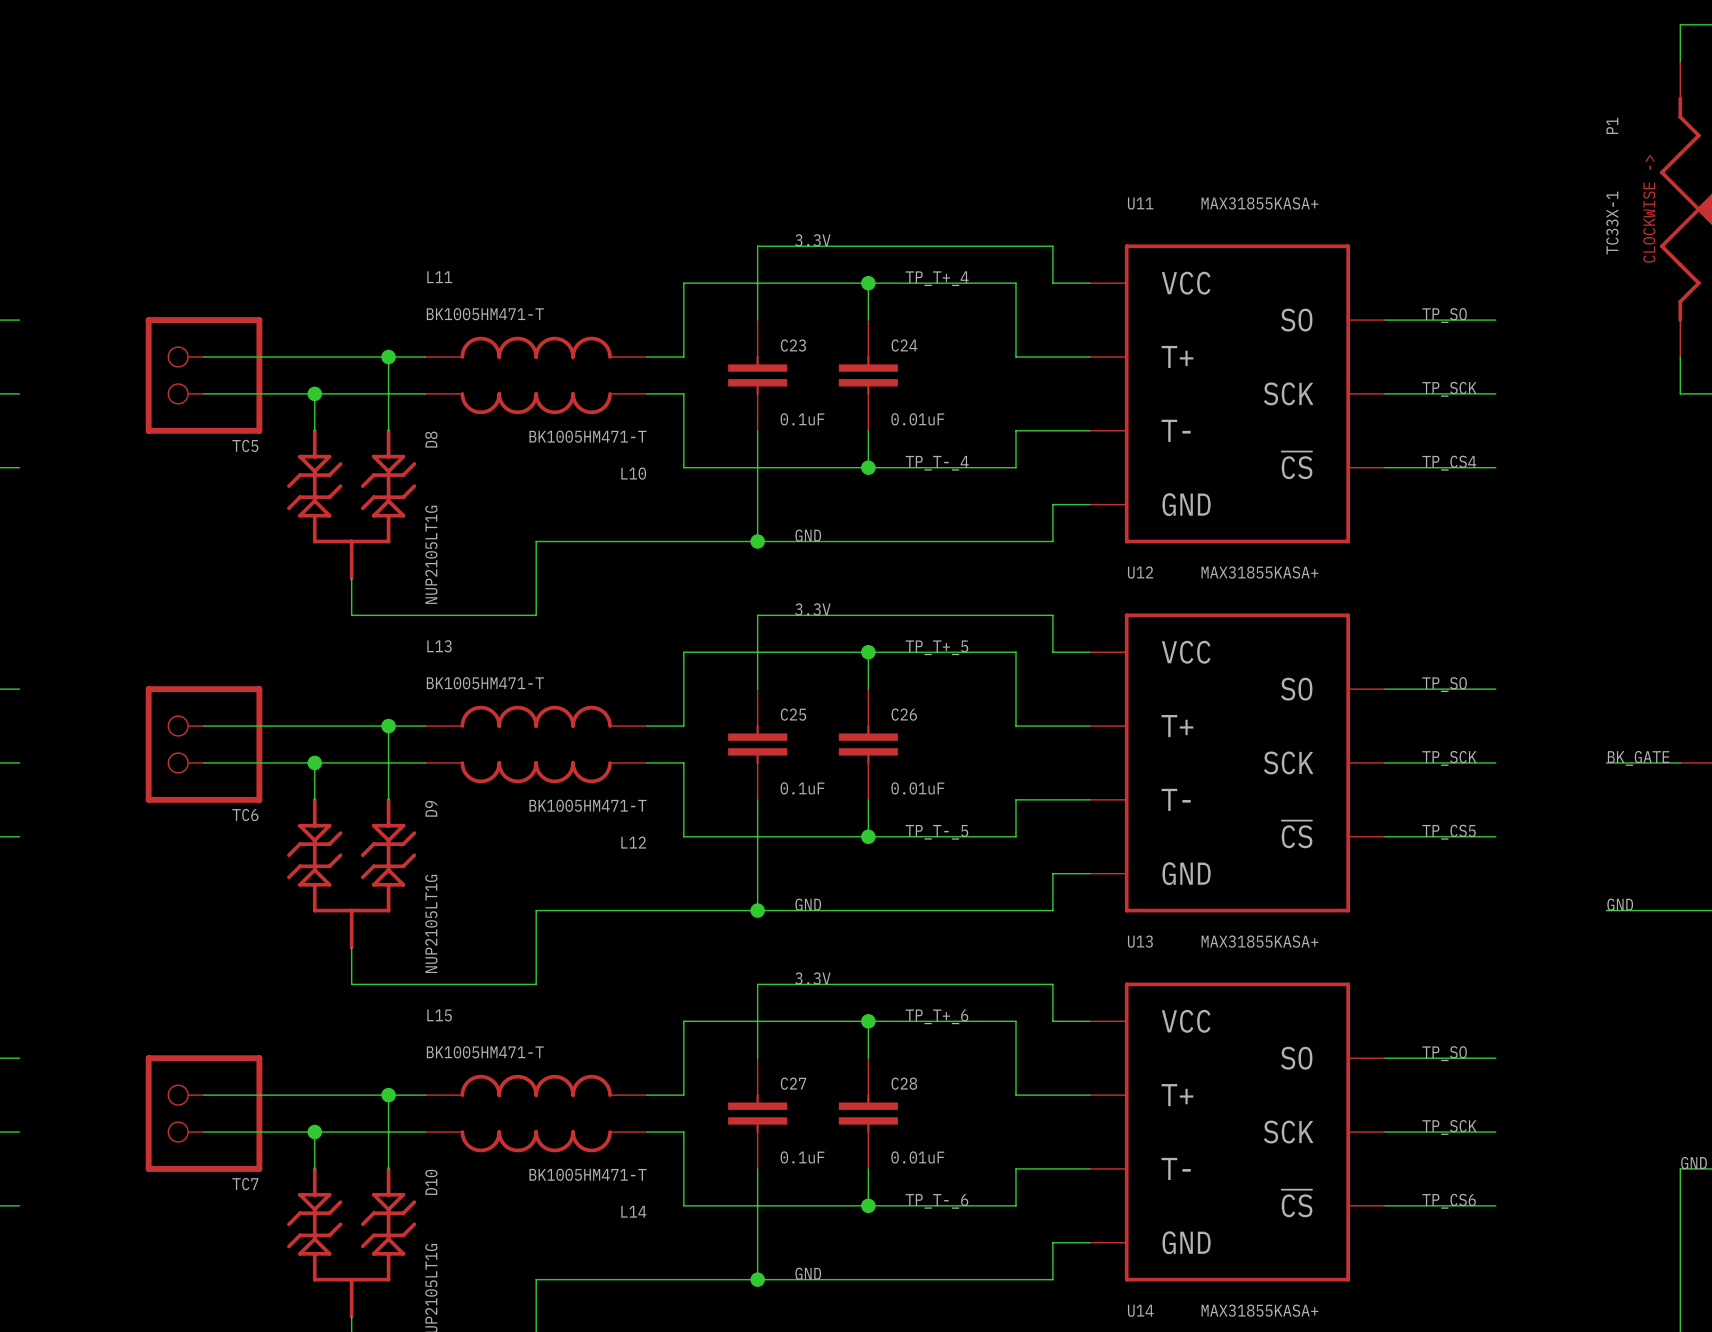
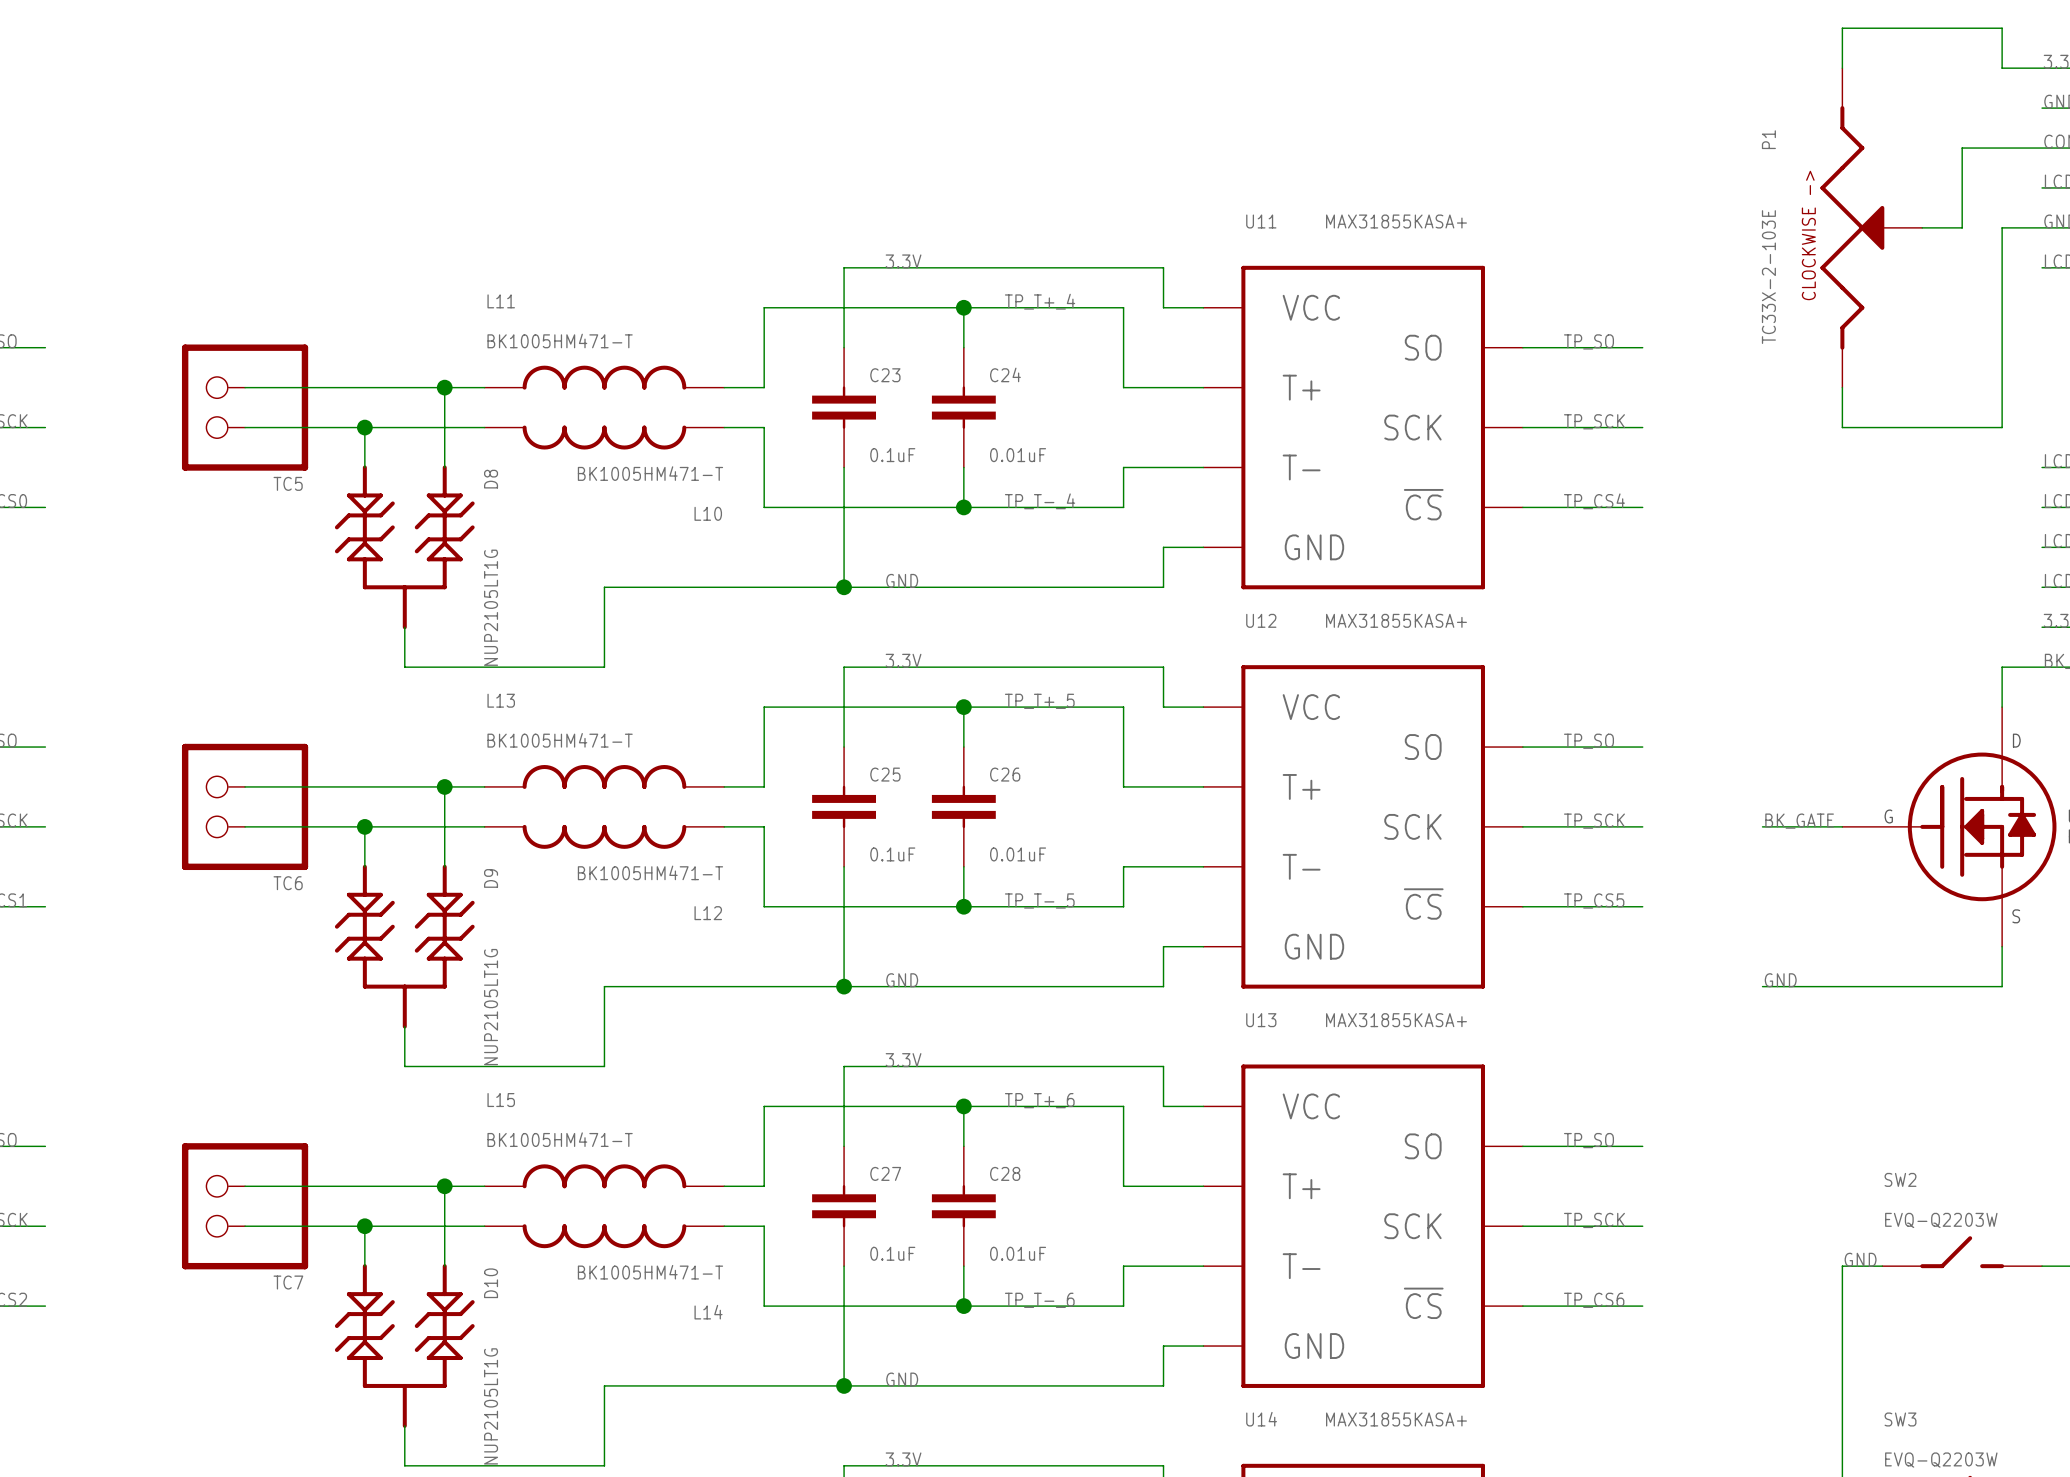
P1 value: TC33X-1 (1612, 223) -> TC33X-2-103E (1768, 277)

